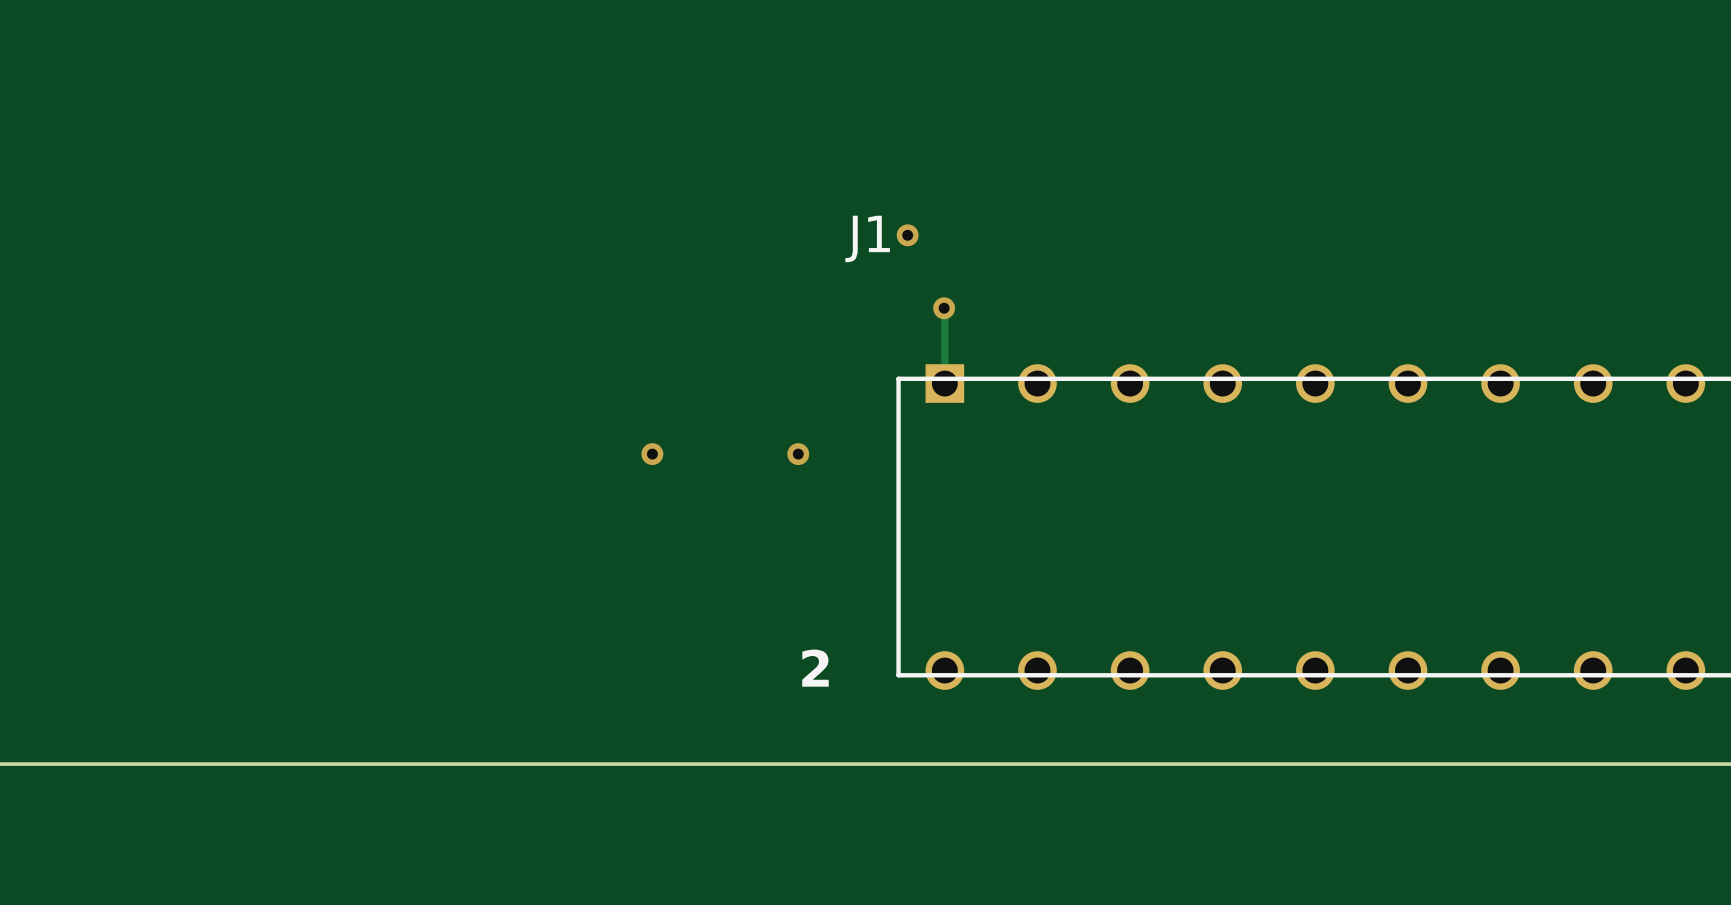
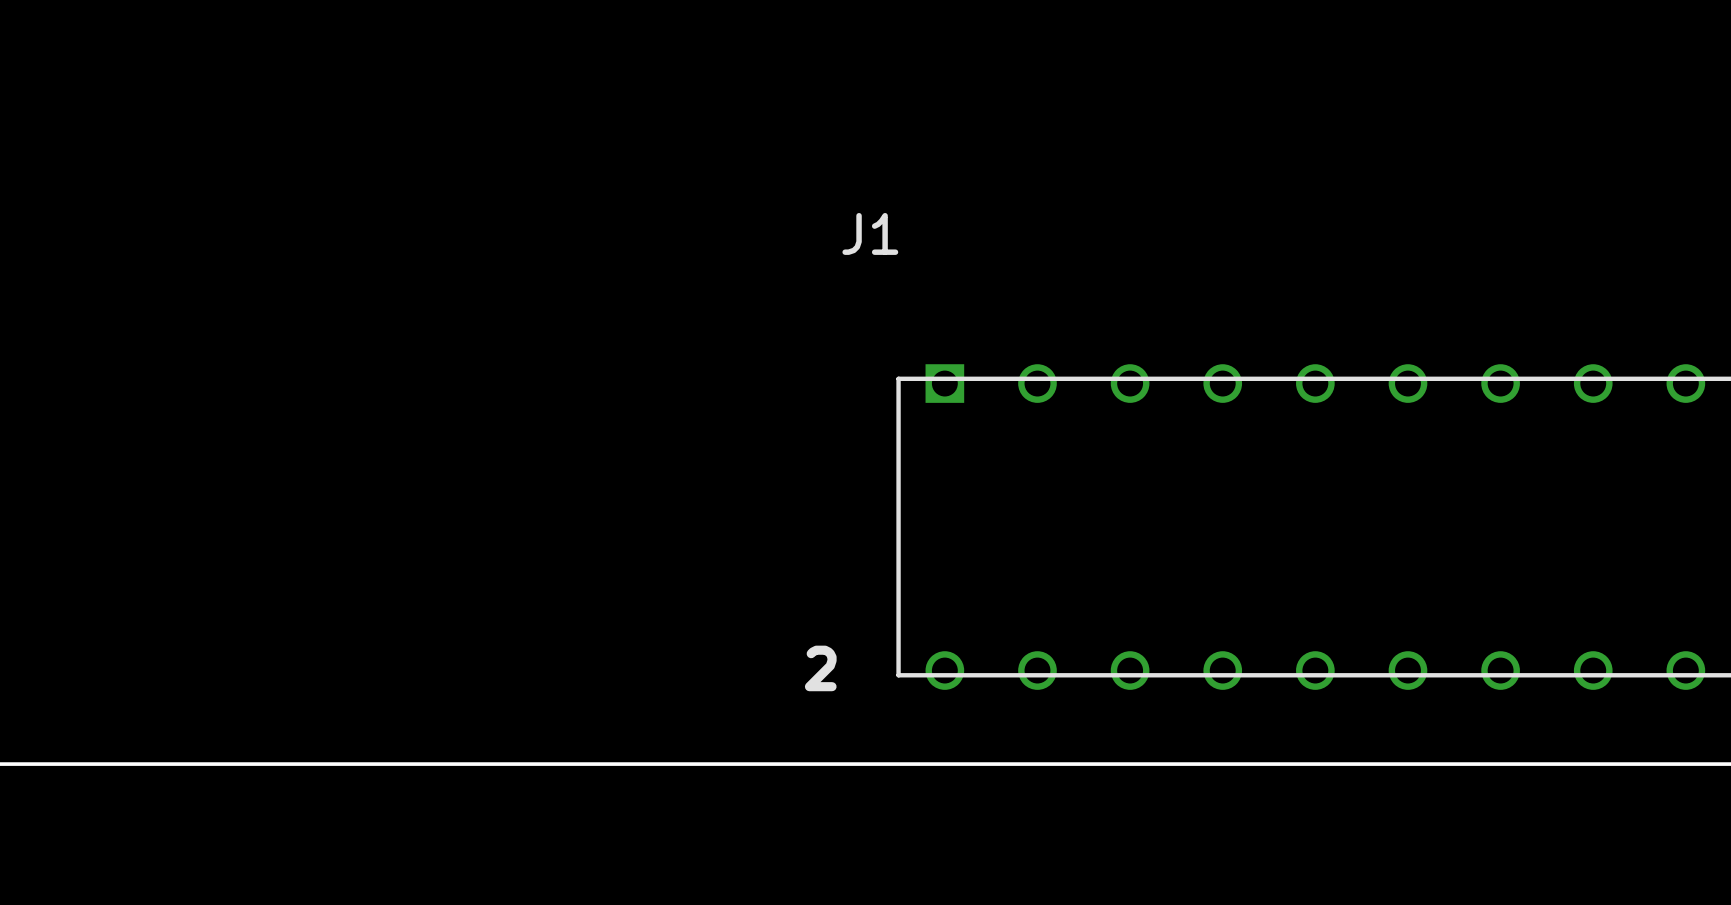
via: (907, 235) -> none
track: (944, 308) (944, 383) -> none
via: (944, 308) -> none
via: (652, 454) -> none
via: (798, 454) -> none

